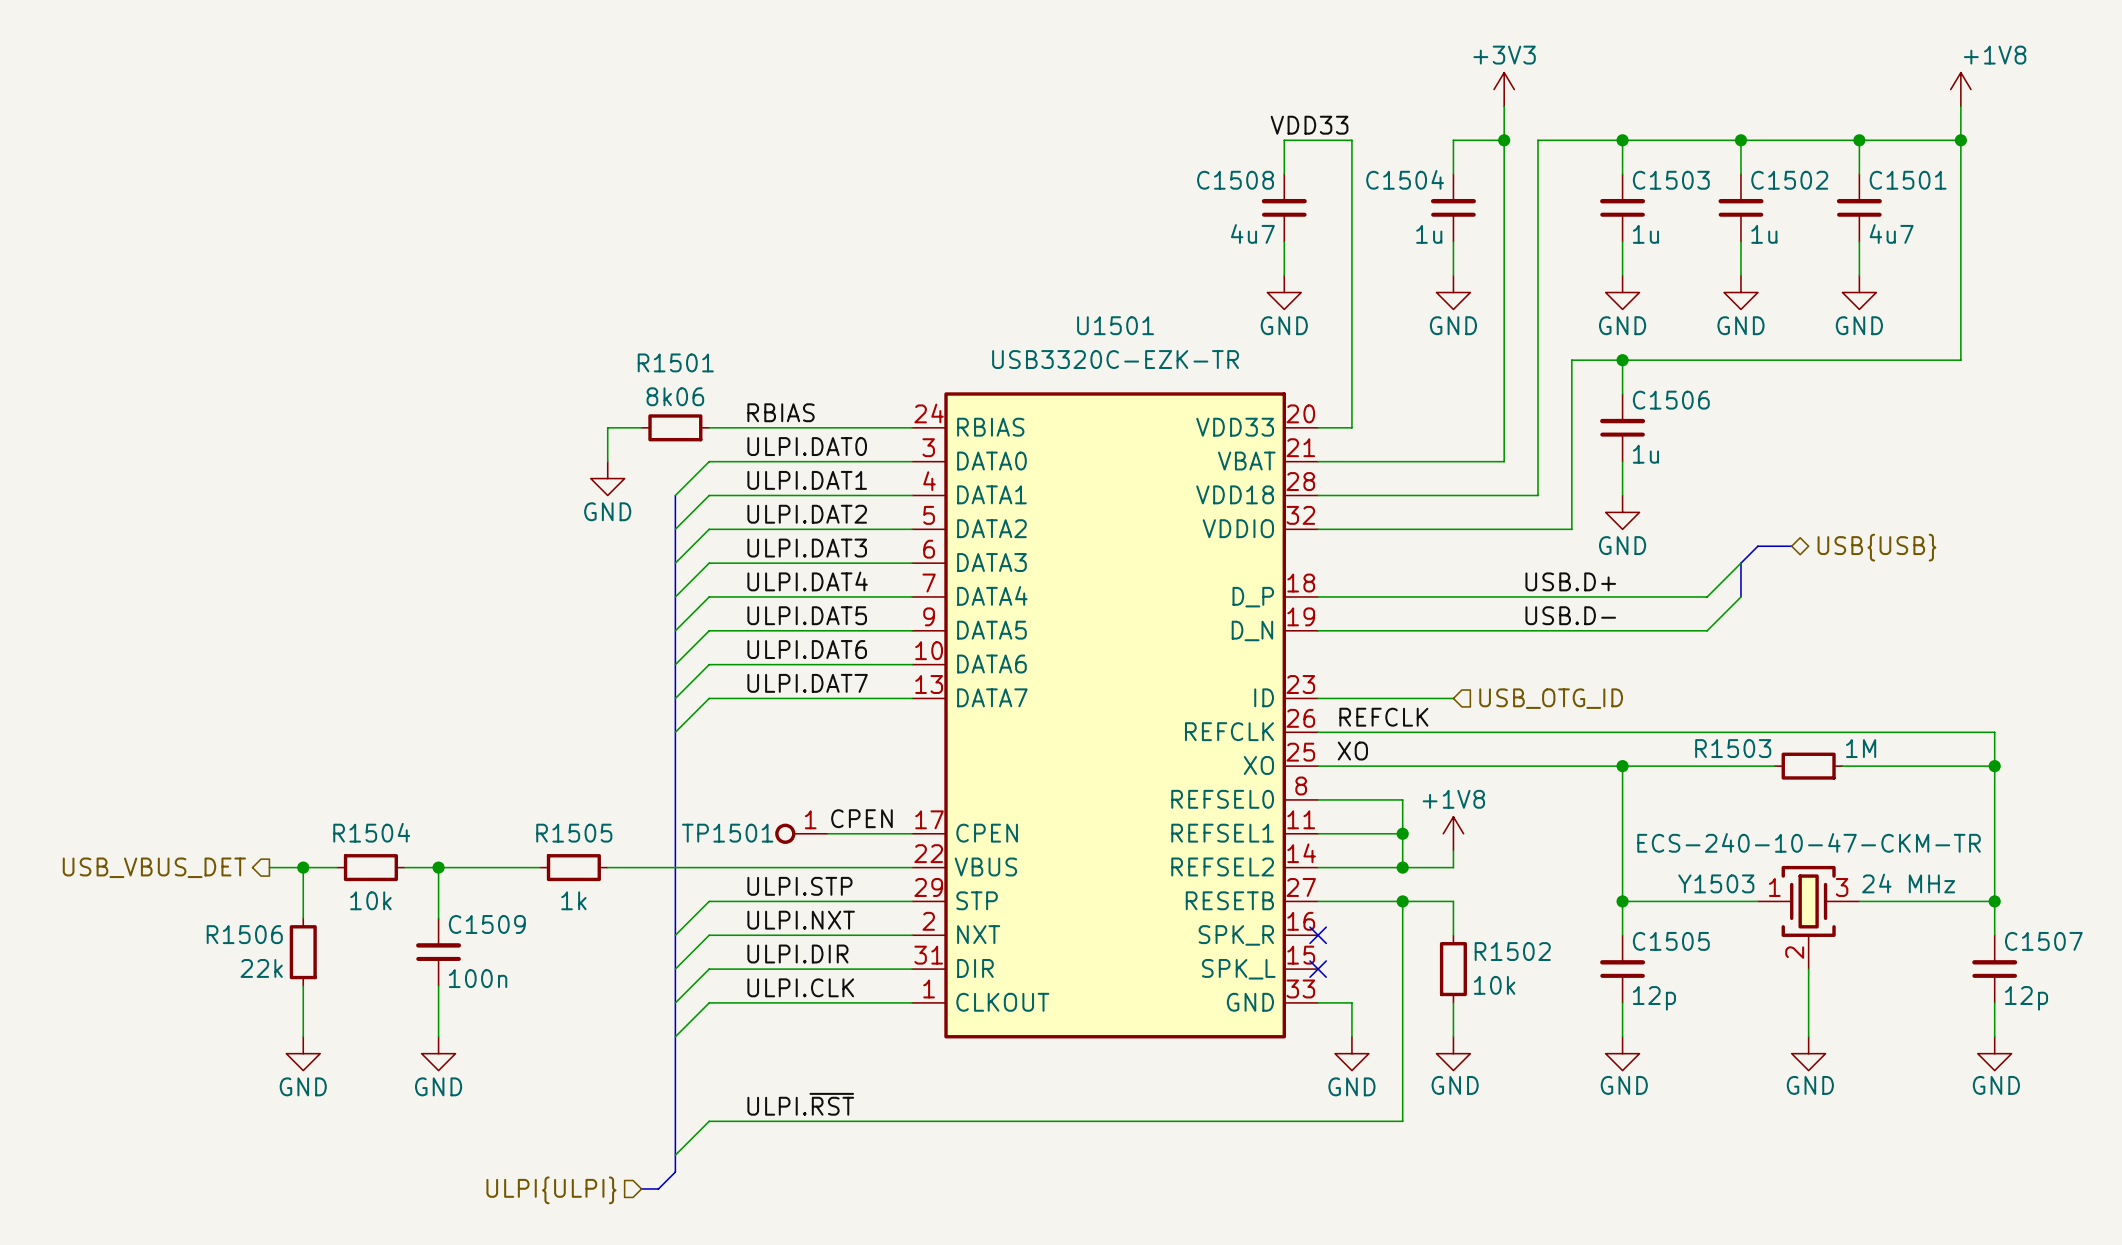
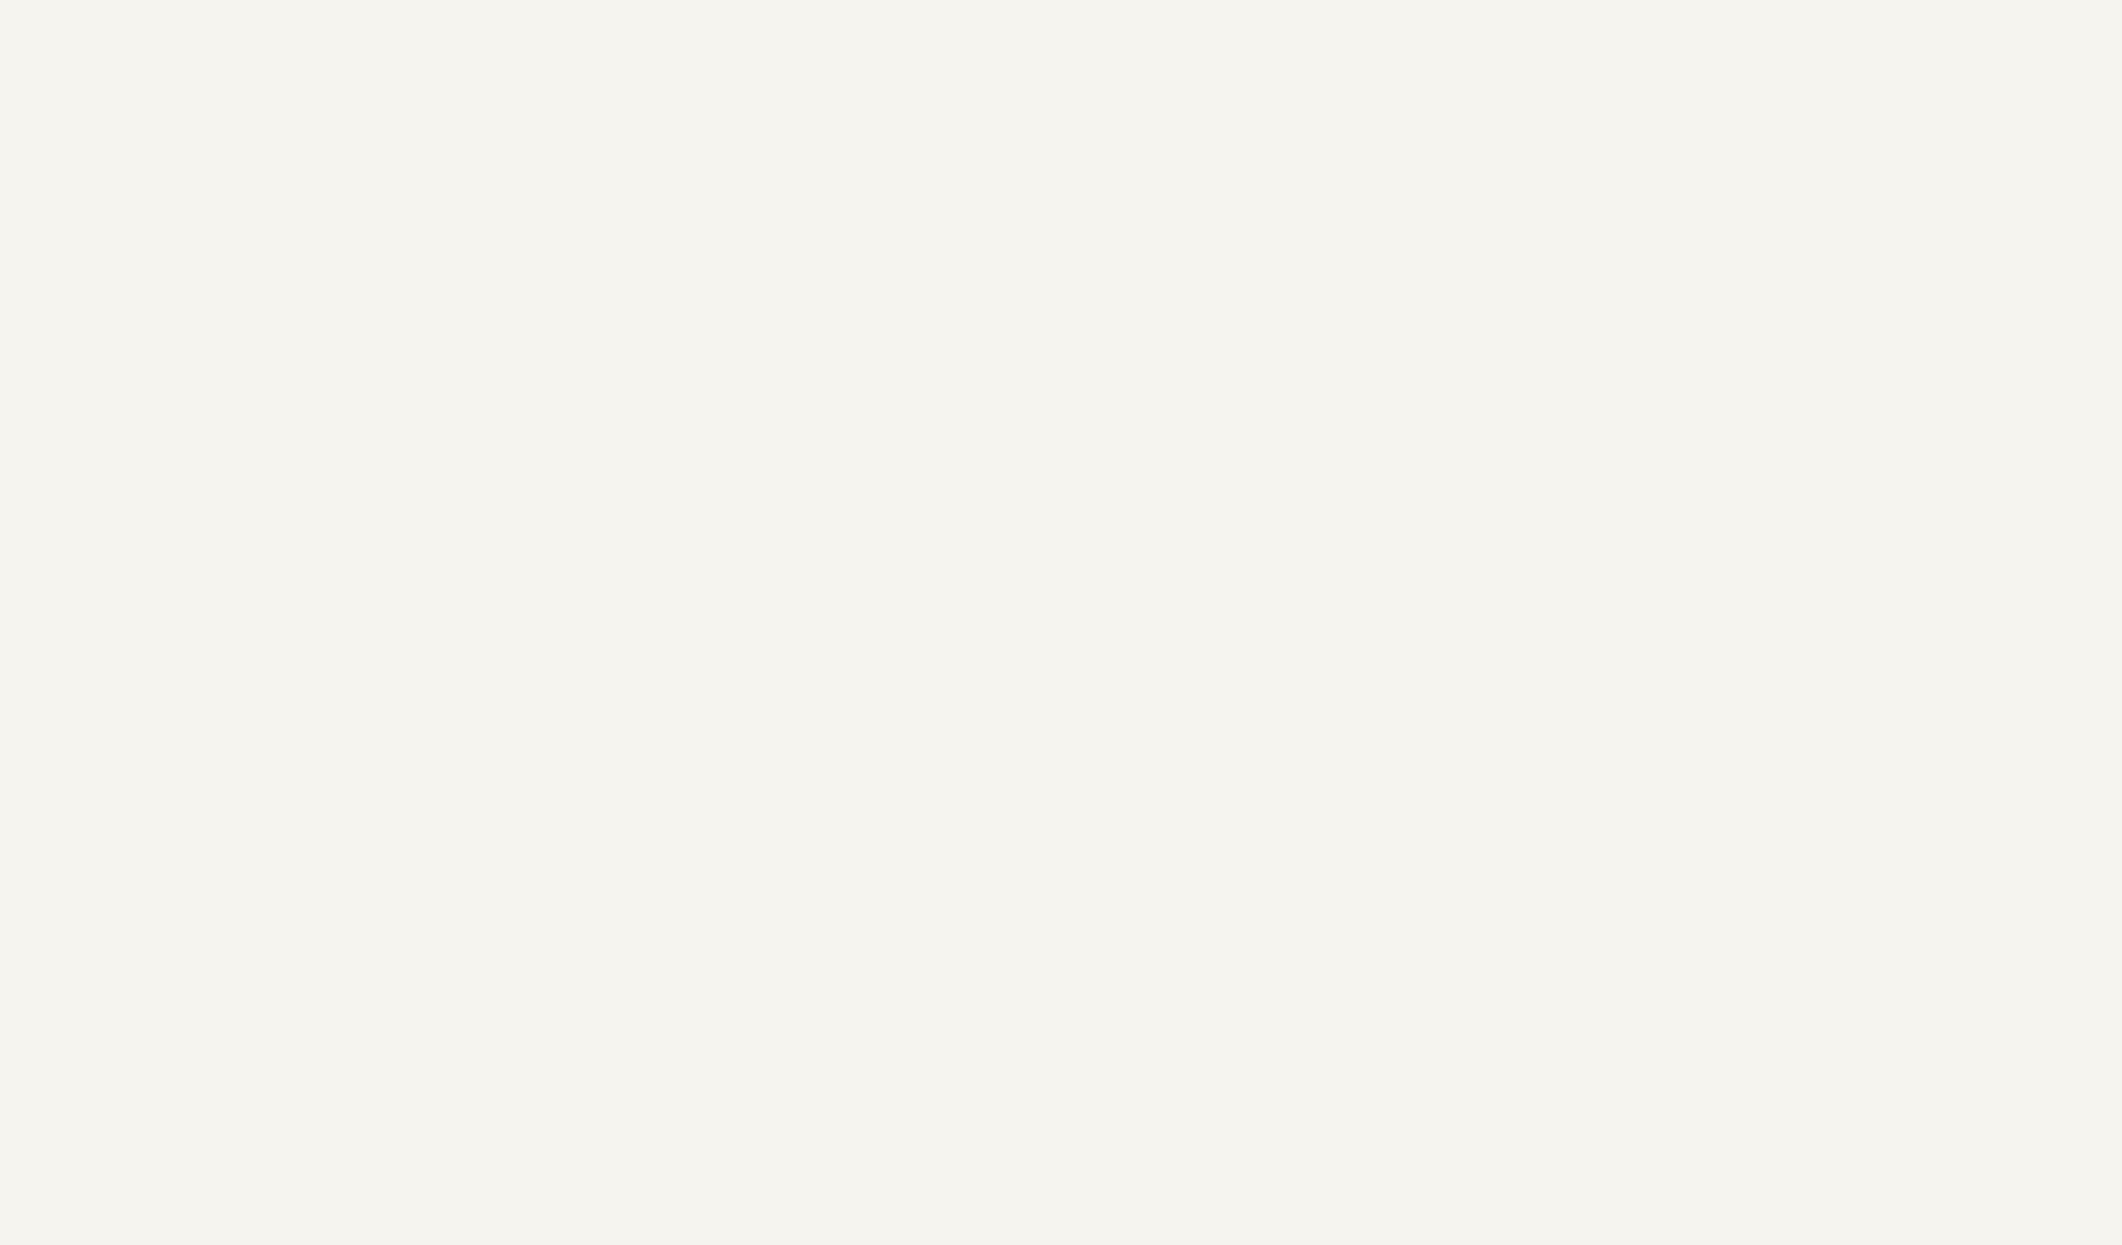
power symbol: +3V3 (1504, 89) -> none
power symbol: +1V8 (1960, 89) -> none
wire: (1504, 106) (1504, 461) (1318, 461) -> none
wire: (1960, 106) (1960, 360) (1571, 360) (1571, 529) (1318, 529) -> none
label: VDD33 (1309, 125) -> none
wire: (1504, 140) (1453, 140) (1453, 174) -> none
junction: (1504, 140) -> none
wire: (1622, 140) (1622, 174) -> none
junction: (1622, 140) -> none
wire: (1740, 140) (1740, 174) -> none
junction: (1740, 140) -> none
wire: (1859, 140) (1859, 174) -> none
junction: (1859, 140) -> none
wire: (1960, 140) (1538, 140) (1538, 495) (1318, 495) -> none
junction: (1960, 140) -> none
wire: (1284, 174) (1284, 140) (1351, 140) (1351, 427) (1318, 427) -> none
C1508: (1284, 207) -> none
C1504: (1453, 207) -> none
C1503: (1622, 207) -> none
C1502: (1740, 207) -> none
C1501: (1859, 207) -> none
wire: (1284, 241) (1284, 275) -> none
wire: (1453, 241) (1453, 275) -> none
wire: (1622, 241) (1622, 275) -> none
wire: (1740, 241) (1740, 275) -> none
wire: (1859, 241) (1859, 275) -> none
power symbol: GND (1284, 292) -> none
power symbol: GND (1453, 292) -> none
power symbol: GND (1622, 292) -> none
power symbol: GND (1740, 292) -> none
power symbol: GND (1859, 292) -> none
wire: (1622, 360) (1622, 394) -> none
junction: (1622, 360) -> none
label: RBIAS (781, 412) -> none
wire: (641, 427) (607, 427) (607, 461) -> none
R1501: (675, 427) -> none
wire: (709, 427) (912, 427) -> none
C1506: (1622, 427) -> none
label: ULPI.DAT0 (807, 446) -> none
wire: (912, 461) (709, 461) (675, 495) -> none
wire: (1622, 461) (1622, 495) -> none
power symbol: GND (607, 478) -> none
label: ULPI.DAT1 (807, 480) -> none
bus: (675, 495) (675, 1172) (658, 1188) (641, 1188) -> none
wire: (912, 495) (709, 495) (675, 529) -> none
power symbol: GND (1622, 512) -> none
label: ULPI.DAT2 (807, 514) -> none
wire: (912, 529) (709, 529) (675, 563) -> none
bus: (1791, 546) (1757, 546) (1740, 563) (1740, 596) -> none
hierarchical label: USB{USB} (1876, 547) -> none
label: ULPI.DAT3 (807, 548) -> none
wire: (912, 563) (709, 563) (675, 596) -> none
wire: (1740, 563) (1707, 596) (1318, 596) -> none
label: ULPI.DAT4 (807, 581) -> none
label: USB.D+ (1570, 581) -> none
wire: (912, 596) (709, 596) (675, 630) -> none
wire: (1740, 596) (1707, 630) (1318, 630) -> none
label: ULPI.DAT5 (807, 615) -> none
label: USB.D- (1570, 615) -> none
wire: (912, 630) (709, 630) (675, 664) -> none
label: ULPI.DAT6 (807, 649) -> none
wire: (912, 664) (709, 664) (675, 698) -> none
label: ULPI.DAT7 (807, 683) -> none
wire: (912, 698) (709, 698) (675, 732) -> none
wire: (1318, 698) (1453, 698) -> none
hierarchical label: USB_OTG_ID (1551, 698) -> none
U1501: (1115, 715) -> none
label: REFCLK (1383, 717) -> none
wire: (1318, 732) (1994, 732) (1994, 935) -> none
label: XO (1352, 751) -> none
wire: (1318, 766) (1774, 766) -> none
wire: (1622, 766) (1622, 935) -> none
junction: (1622, 766) -> none
R1503: (1808, 766) -> none
wire: (1842, 766) (1994, 766) -> none
junction: (1994, 766) -> none
wire: (1318, 799) (1402, 799) (1402, 867) -> none
label: CPEN (861, 818) -> none
TP1501: (801, 833) -> none
wire: (827, 833) (912, 833) -> none
wire: (1318, 833) (1402, 833) -> none
junction: (1402, 833) -> none
power symbol: +1V8 (1453, 833) -> none
wire: (1453, 850) (1453, 867) (1318, 867) -> none
hierarchical label: USB_VBUS_DET (154, 867) -> none
wire: (269, 867) (337, 867) -> none
wire: (303, 867) (303, 918) -> none
junction: (303, 867) -> none
R1504: (370, 867) -> none
wire: (404, 867) (540, 867) -> none
wire: (438, 867) (438, 918) -> none
junction: (438, 867) -> none
R1505: (573, 867) -> none
wire: (607, 867) (912, 867) -> none
junction: (1402, 867) -> none
label: ULPI.STP (799, 886) -> none
wire: (912, 901) (709, 901) (675, 935) -> none
wire: (1318, 901) (1453, 901) (1453, 935) -> none
wire: (1402, 901) (1402, 1121) (709, 1121) (675, 1155) -> none
junction: (1402, 901) -> none
wire: (1622, 901) (1757, 901) -> none
junction: (1622, 901) -> none
wire: (1859, 901) (1994, 901) -> none
junction: (1994, 901) -> none
Y1503: (1808, 917) -> none
label: ULPI.NXT (801, 920) -> none
wire: (912, 935) (709, 935) (675, 969) -> none
no-connect mark: (1318, 935) -> none
R1506: (303, 952) -> none
C1509: (438, 952) -> none
label: ULPI.DIR (797, 954) -> none
wire: (912, 969) (709, 969) (675, 1002) -> none
no-connect mark: (1318, 969) -> none
R1502: (1453, 969) -> none
C1505: (1622, 969) -> none
wire: (1808, 969) (1808, 1036) -> none
C1507: (1994, 969) -> none
wire: (303, 986) (303, 1036) -> none
wire: (438, 986) (438, 1036) -> none
label: ULPI.CLK (800, 987) -> none
wire: (912, 1002) (709, 1002) (675, 1036) -> none
wire: (1318, 1002) (1351, 1002) (1351, 1036) -> none
wire: (1453, 1002) (1453, 1036) -> none
wire: (1622, 1002) (1622, 1036) -> none
wire: (1994, 1002) (1994, 1036) -> none
power symbol: GND (303, 1053) -> none
power symbol: GND (438, 1053) -> none
power symbol: GND (1351, 1053) -> none
power symbol: GND (1453, 1053) -> none
power symbol: GND (1622, 1053) -> none
power symbol: GND (1808, 1053) -> none
power symbol: GND (1994, 1053) -> none
label: ULPI.~{RST} (800, 1104) -> none
hierarchical label: ULPI{ULPI} (551, 1190) -> none

